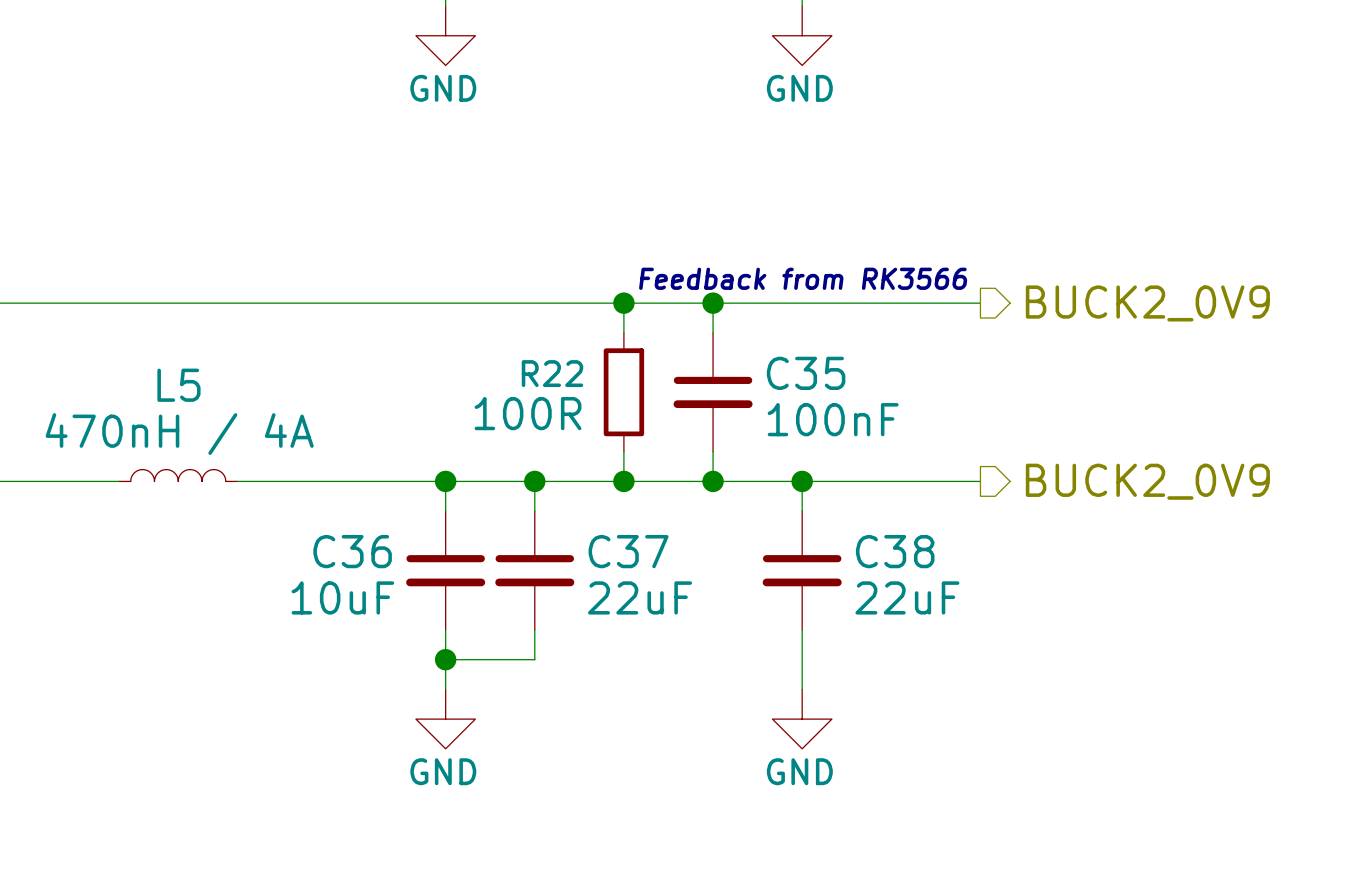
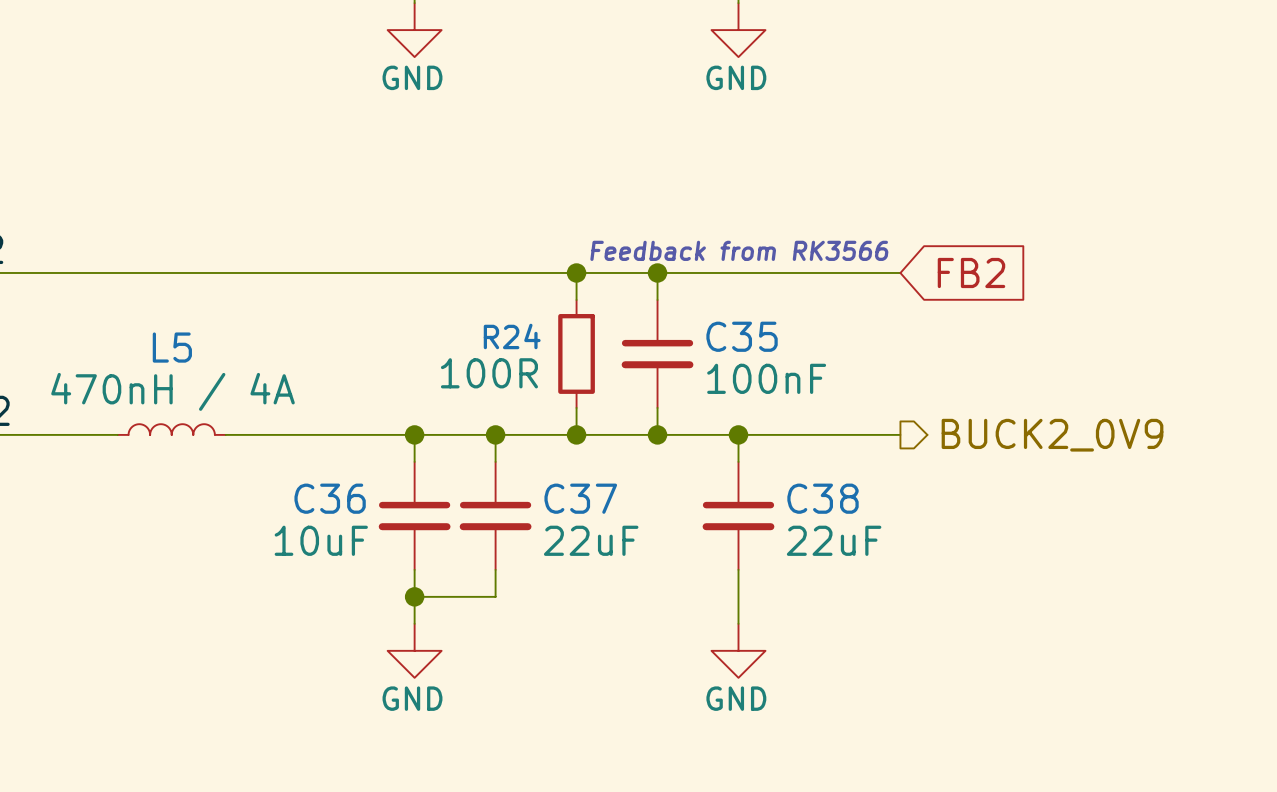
global label: none -> FB2 (971, 272)
hierarchical label: BUCK2_0V9 (1147, 303) -> none
R22 name: R22 (552, 373) -> R24 (512, 336)

